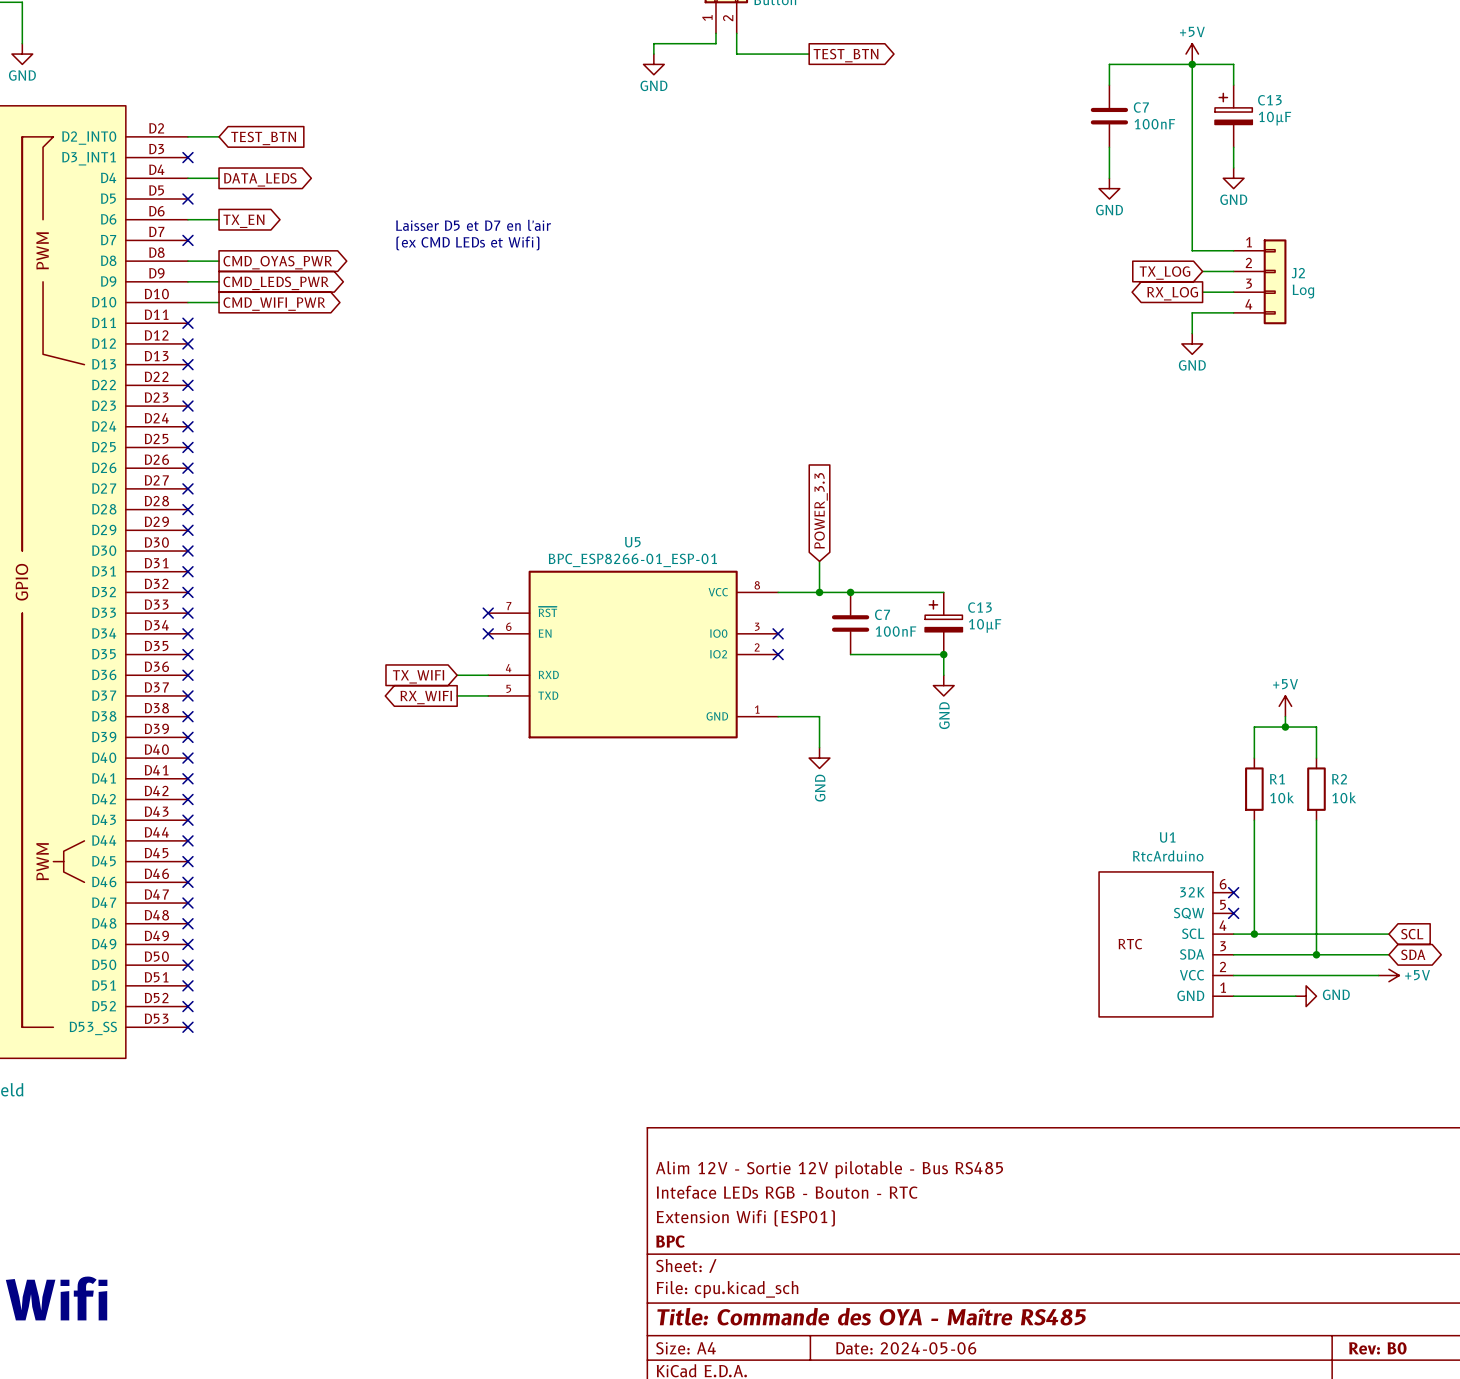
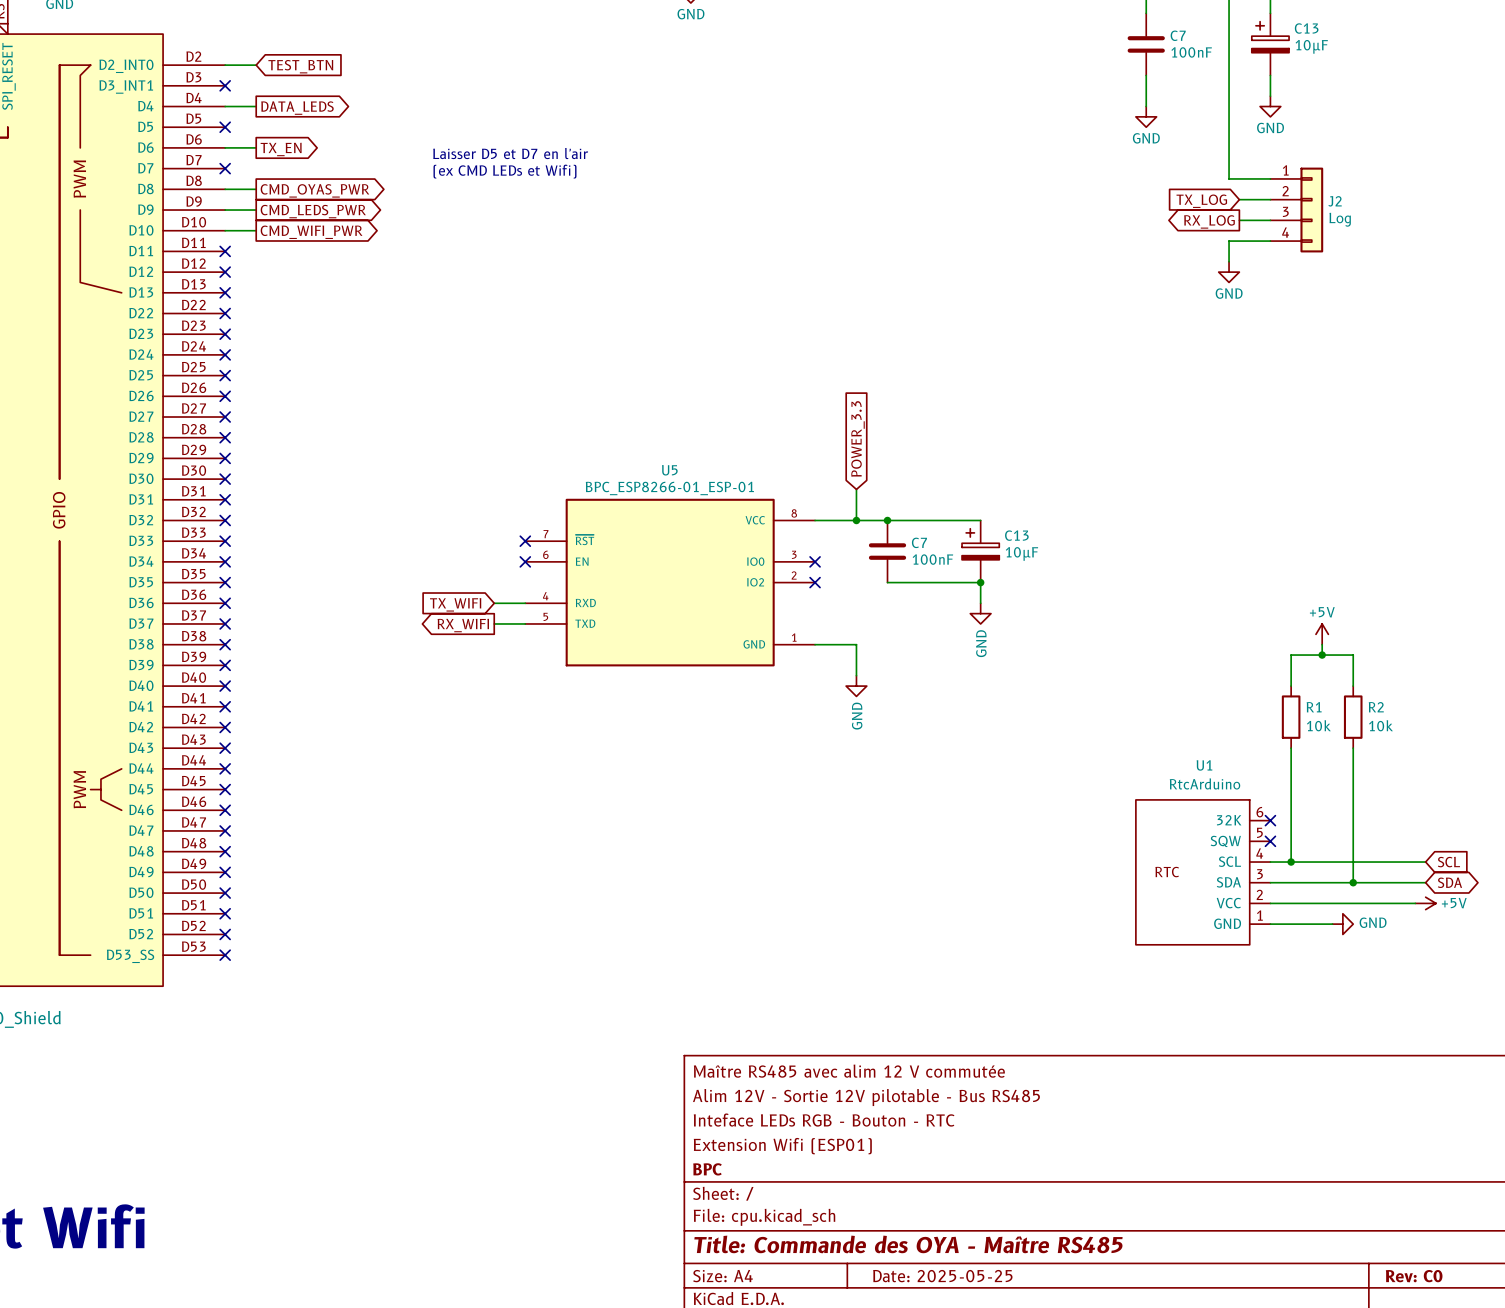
title block: none -> Maître RS485 avec alim 12 V commutée (849, 1071)
title block: Date: 2024-05-06 (906, 1348) -> Date: 2025-05-25 (942, 1276)
title block: Rev: B0 (1377, 1348) -> Rev: C0 (1414, 1276)

